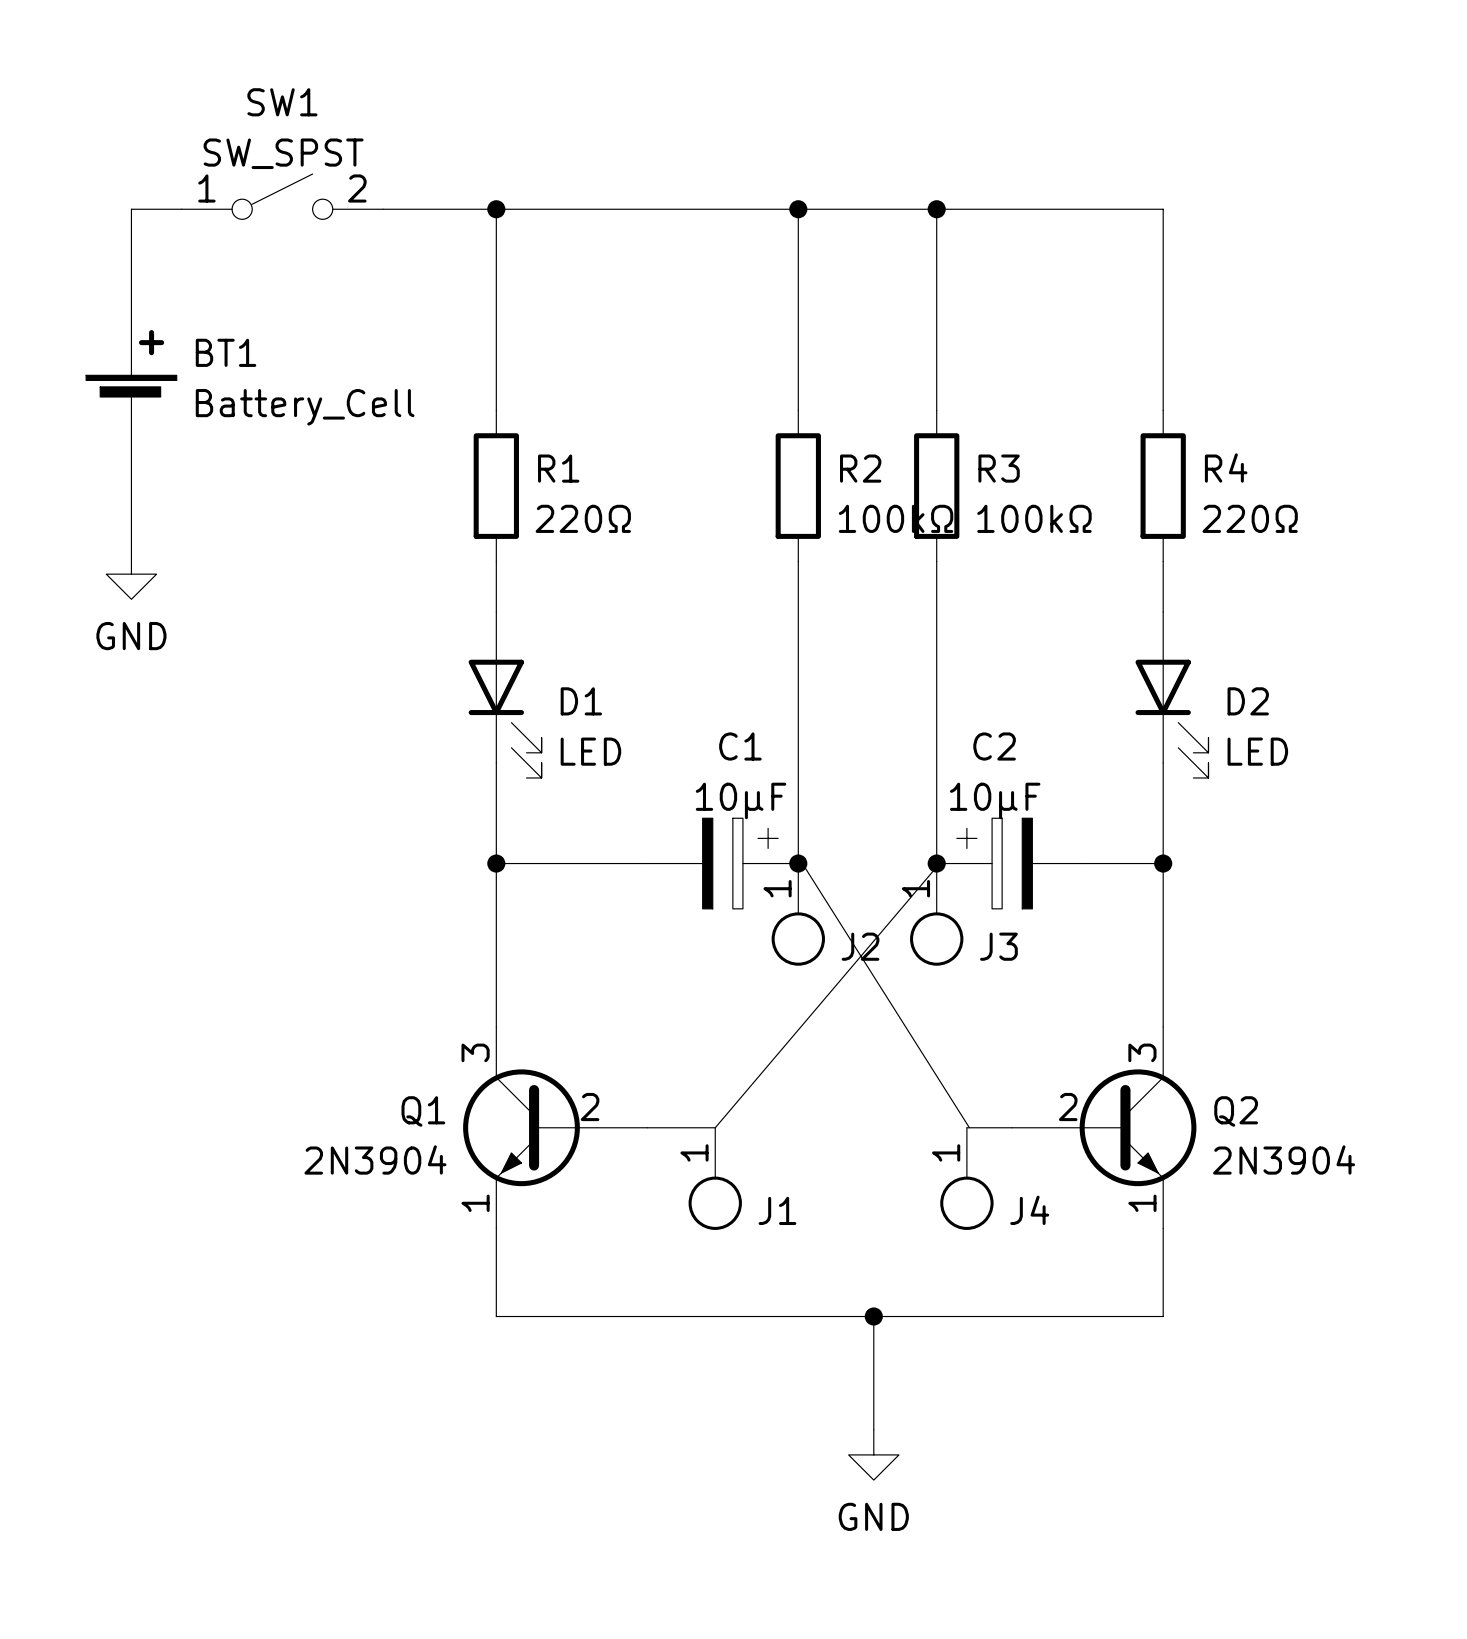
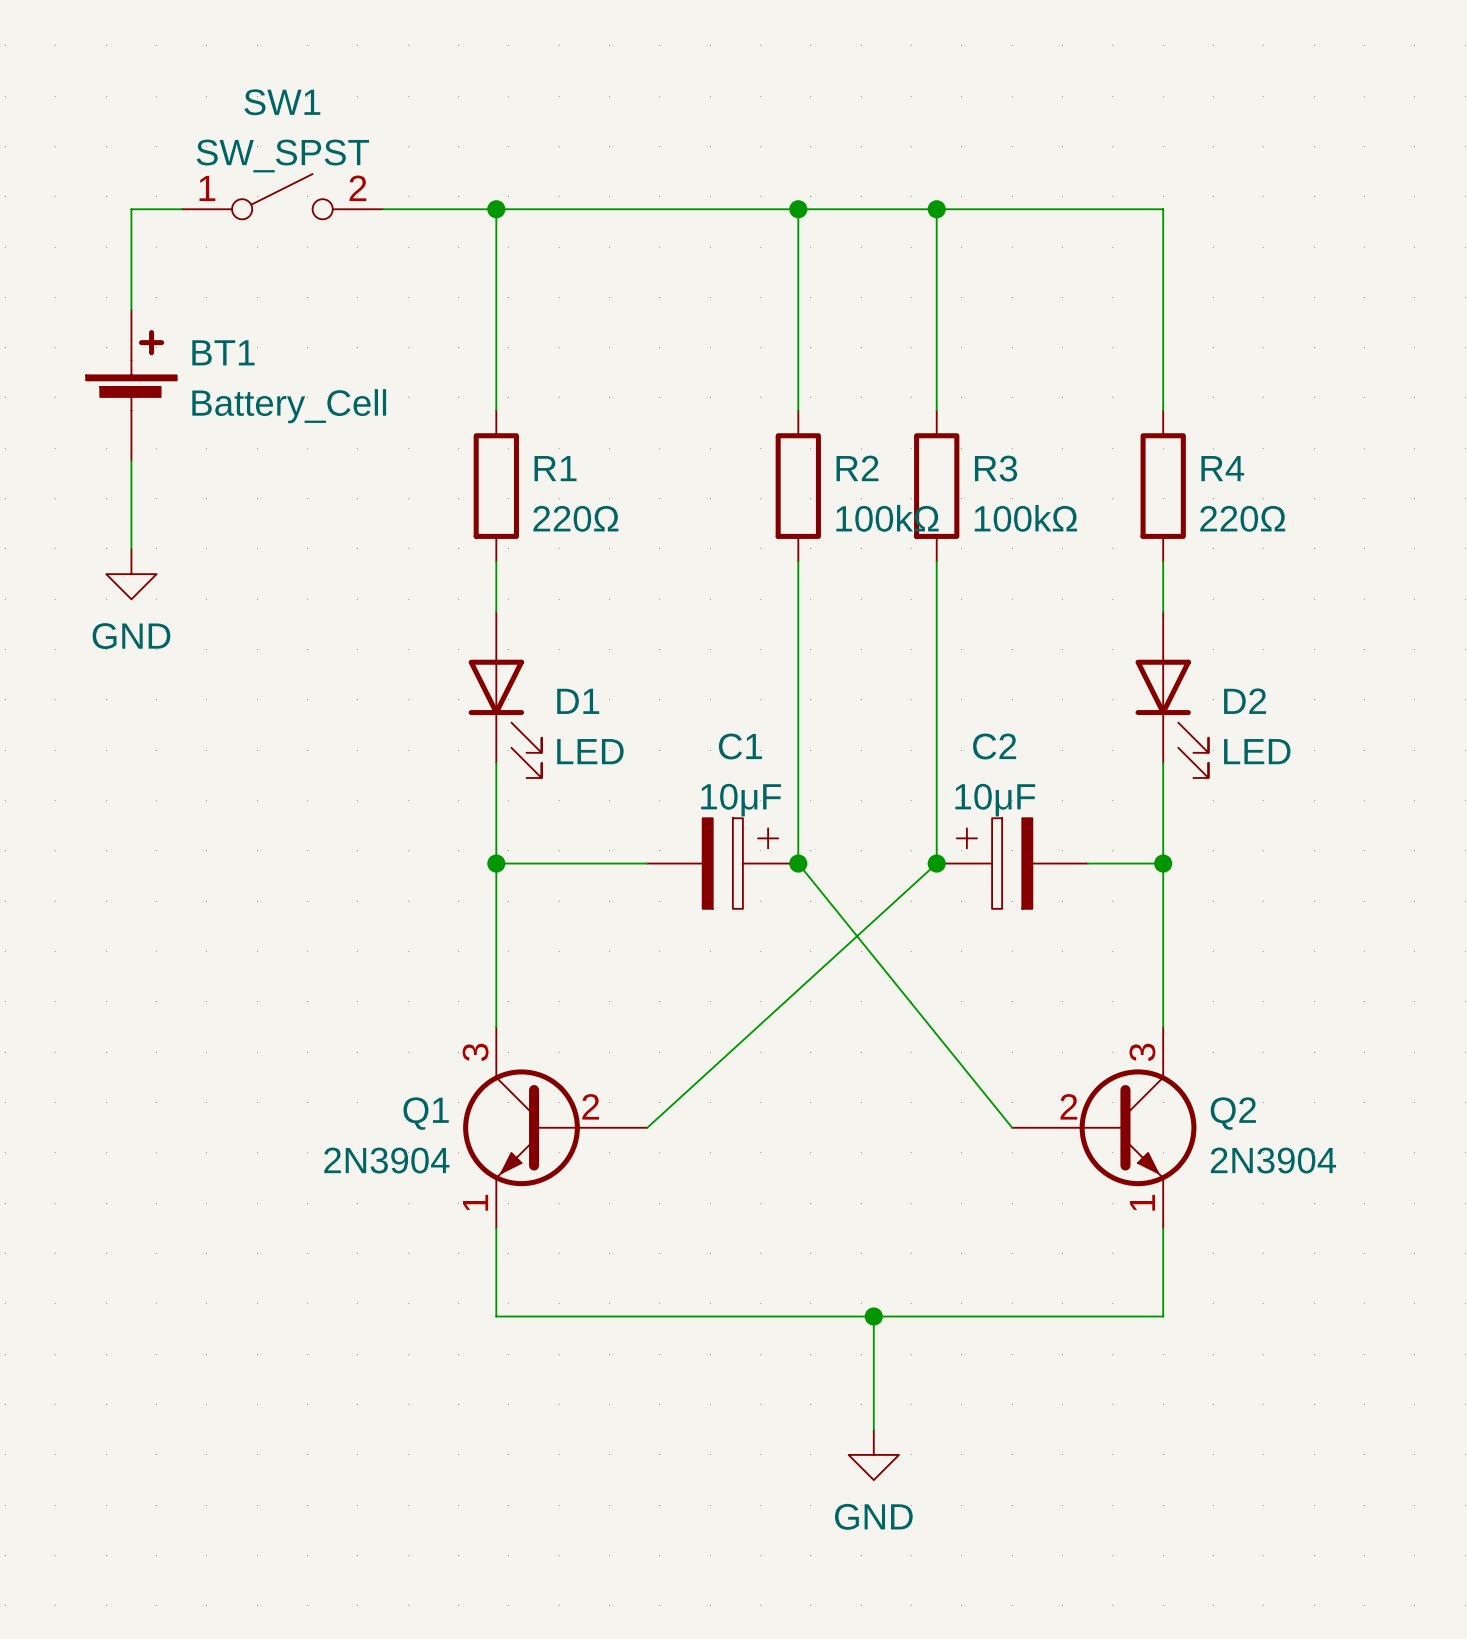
line: (800, 861) (969, 1127) -> none
line: (941, 861) (715, 1127) -> none
J2: (798, 914) -> none
J3: (936, 914) -> none
wire: (647, 1127) (715, 1127) -> (647, 1127) (936, 863)
wire: (966, 1127) (1012, 1127) -> (798, 863) (1012, 1127)
J1: (715, 1178) -> none
J4: (966, 1178) -> none

